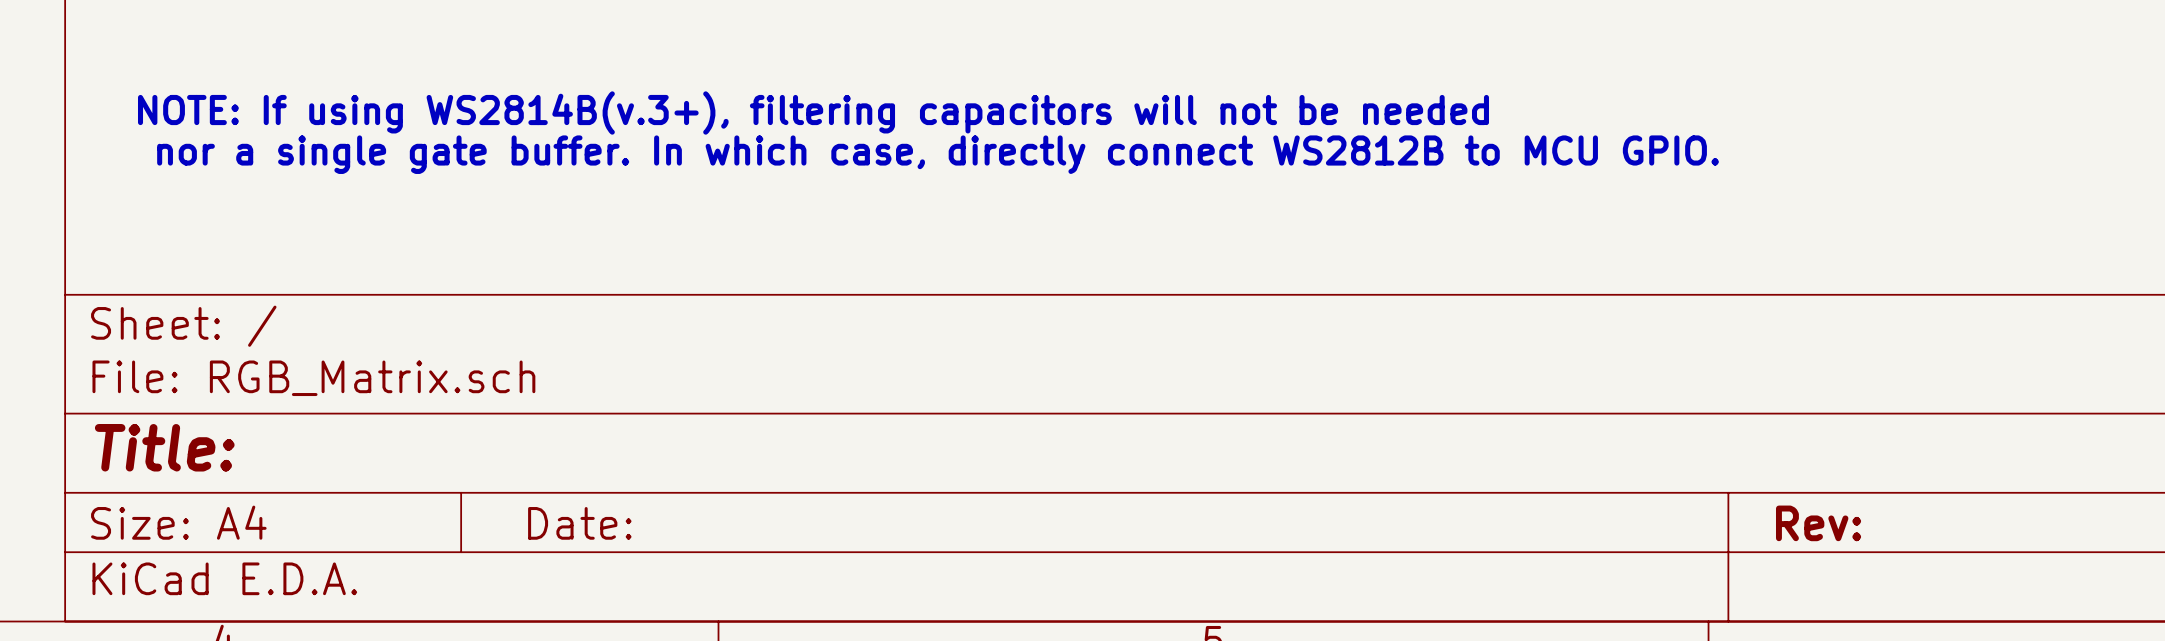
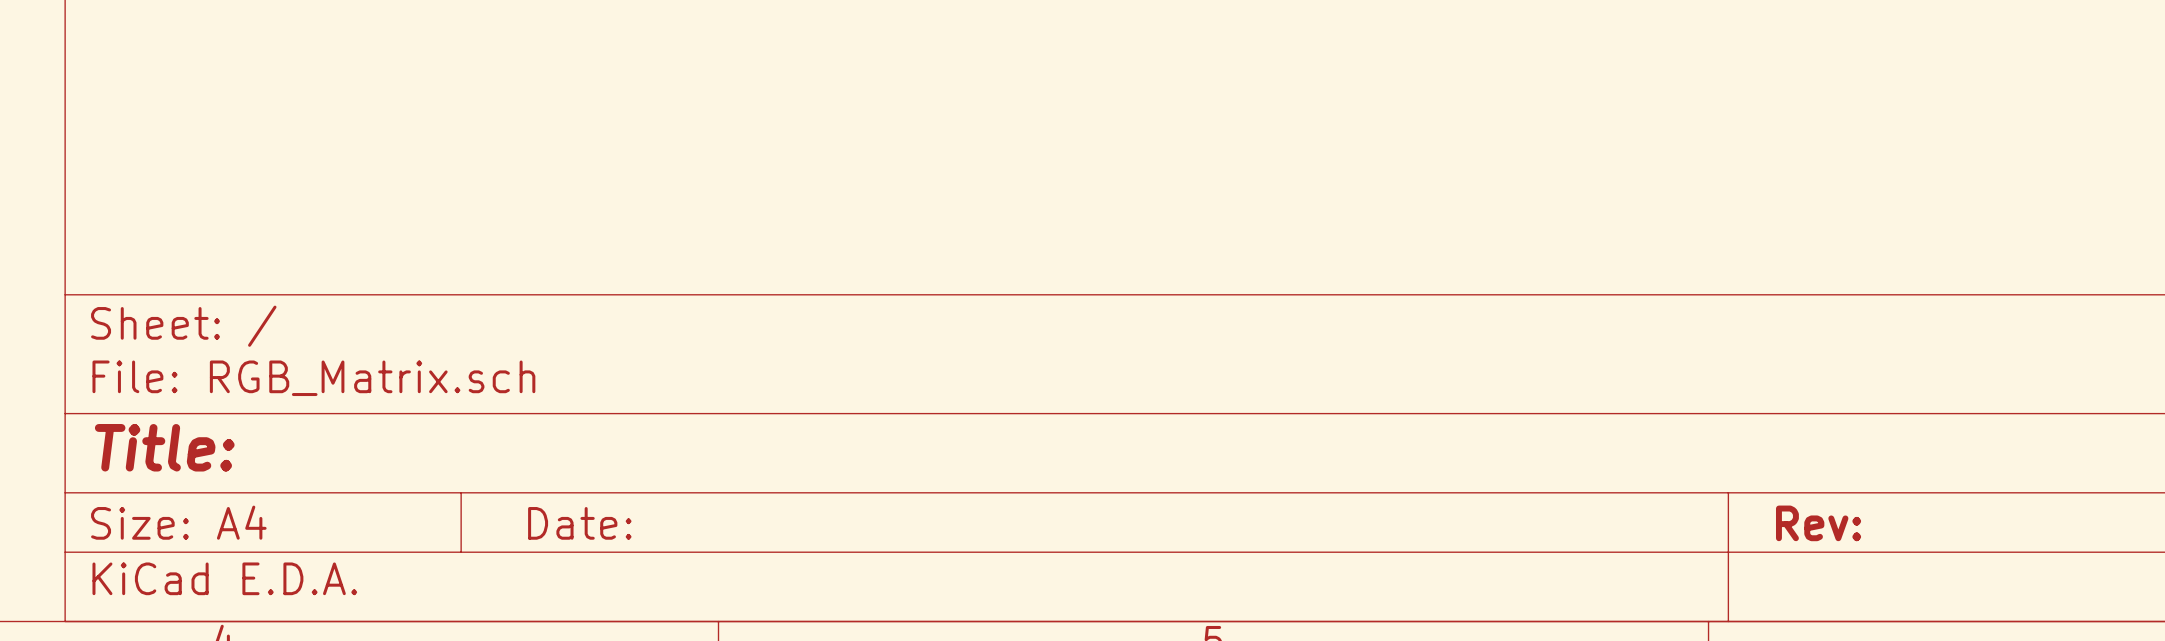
text: NOTE: If using WS2814B(v.3+), filtering capacitors will not be needed (813, 113) -> none
text: nor a single gate buffer. In which case, directly connect WS2812B to MCU GPIO. (938, 154) -> none

